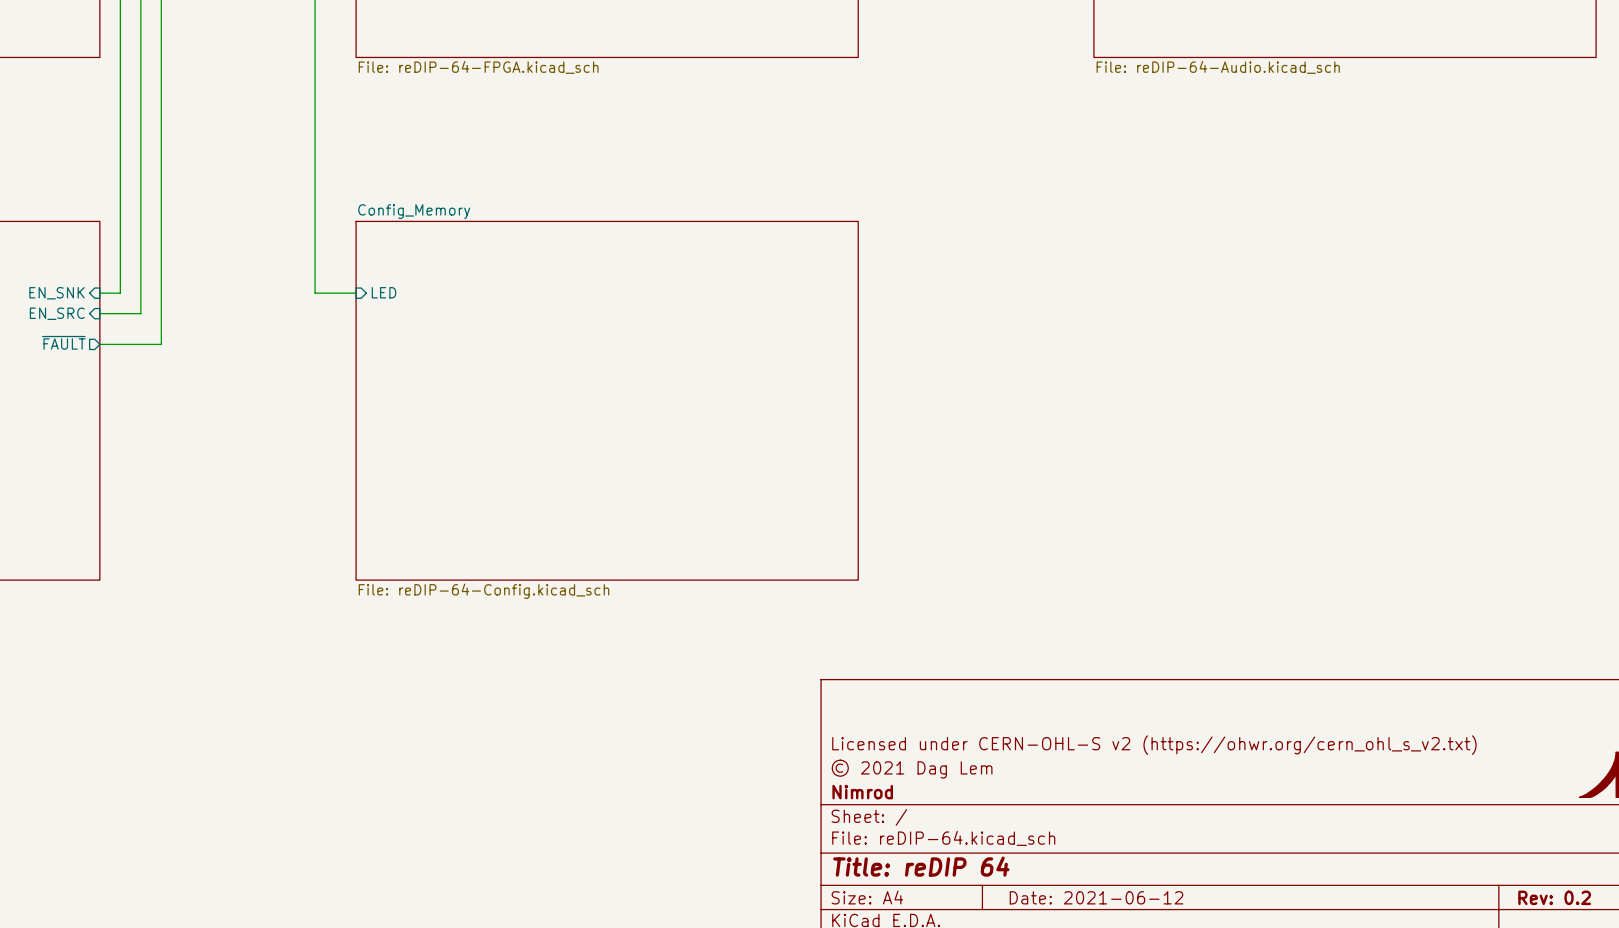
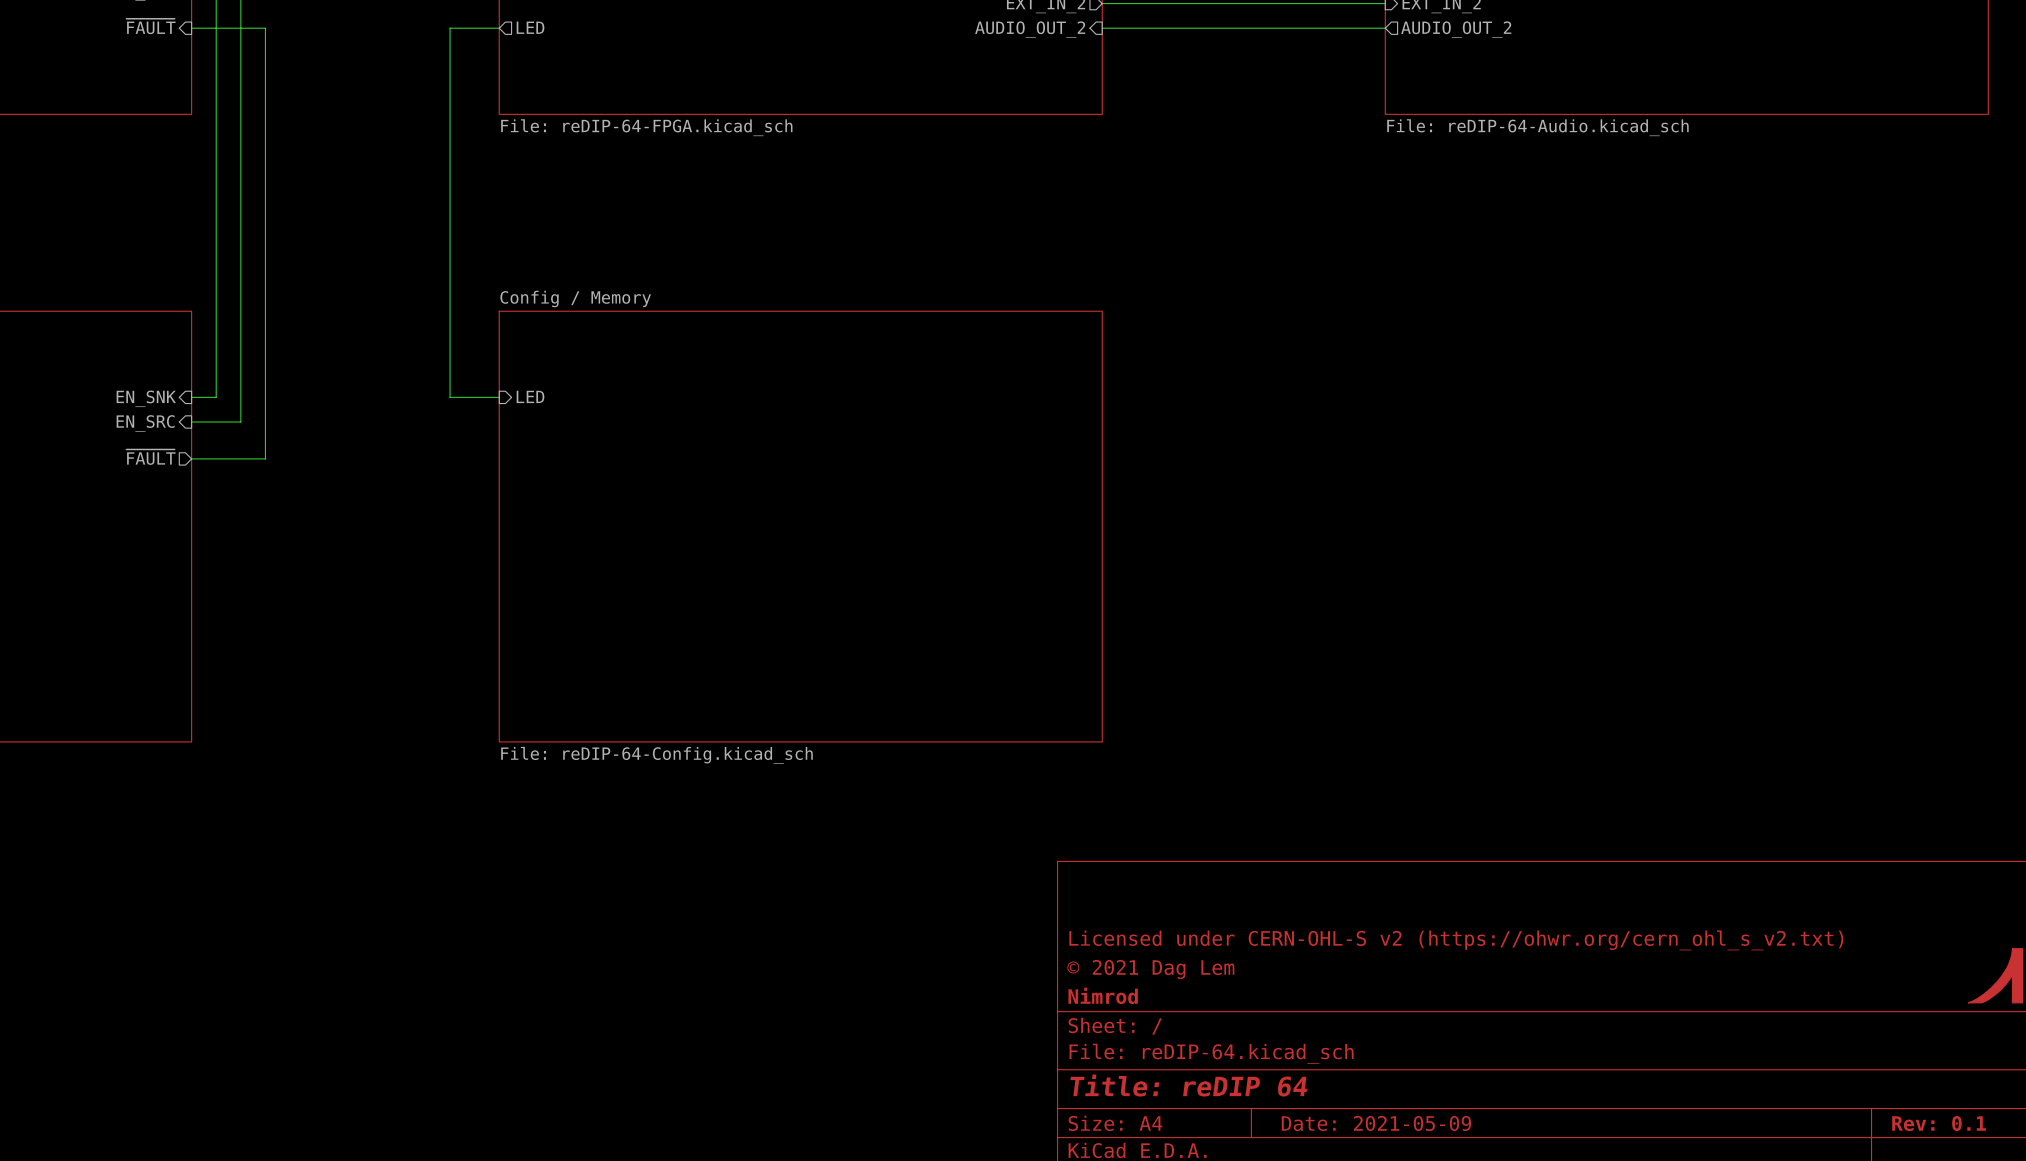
sheet Config_Memory name: Config_Memory (414, 211) -> Config / Memory (575, 298)
title block: Date: 2021-06-12 (1096, 897) -> Date: 2021-05-09 (1376, 1123)
title block: Rev: 0.2 (1554, 897) -> Rev: 0.1 (1939, 1123)

